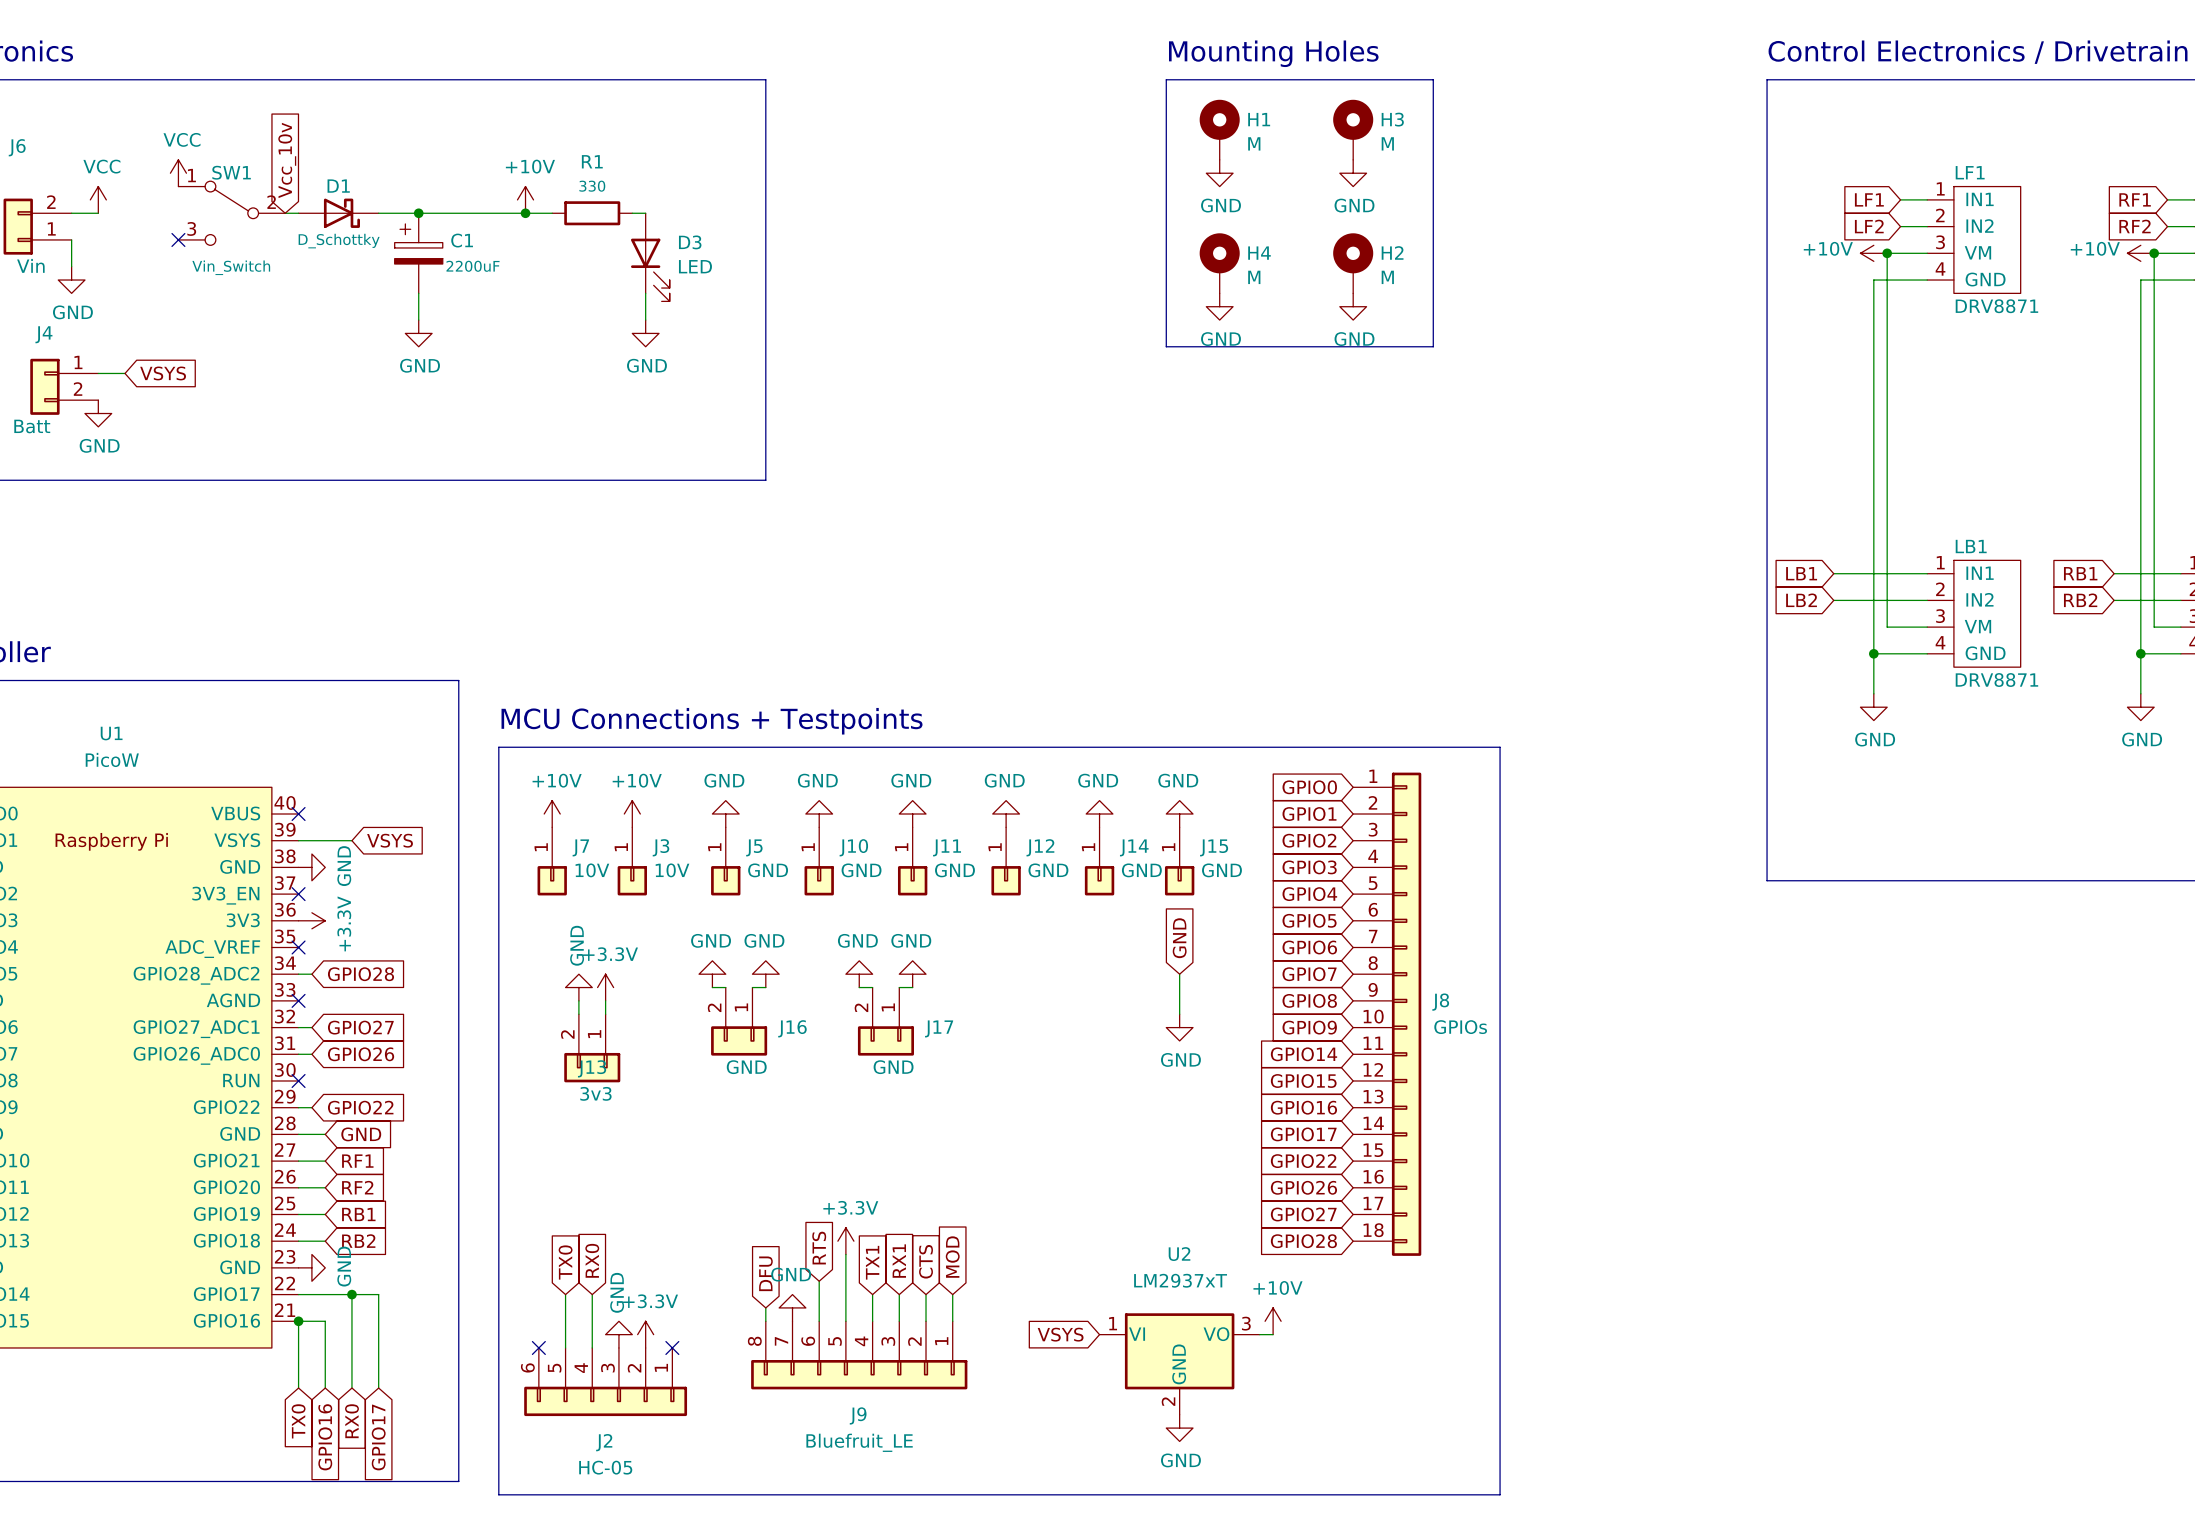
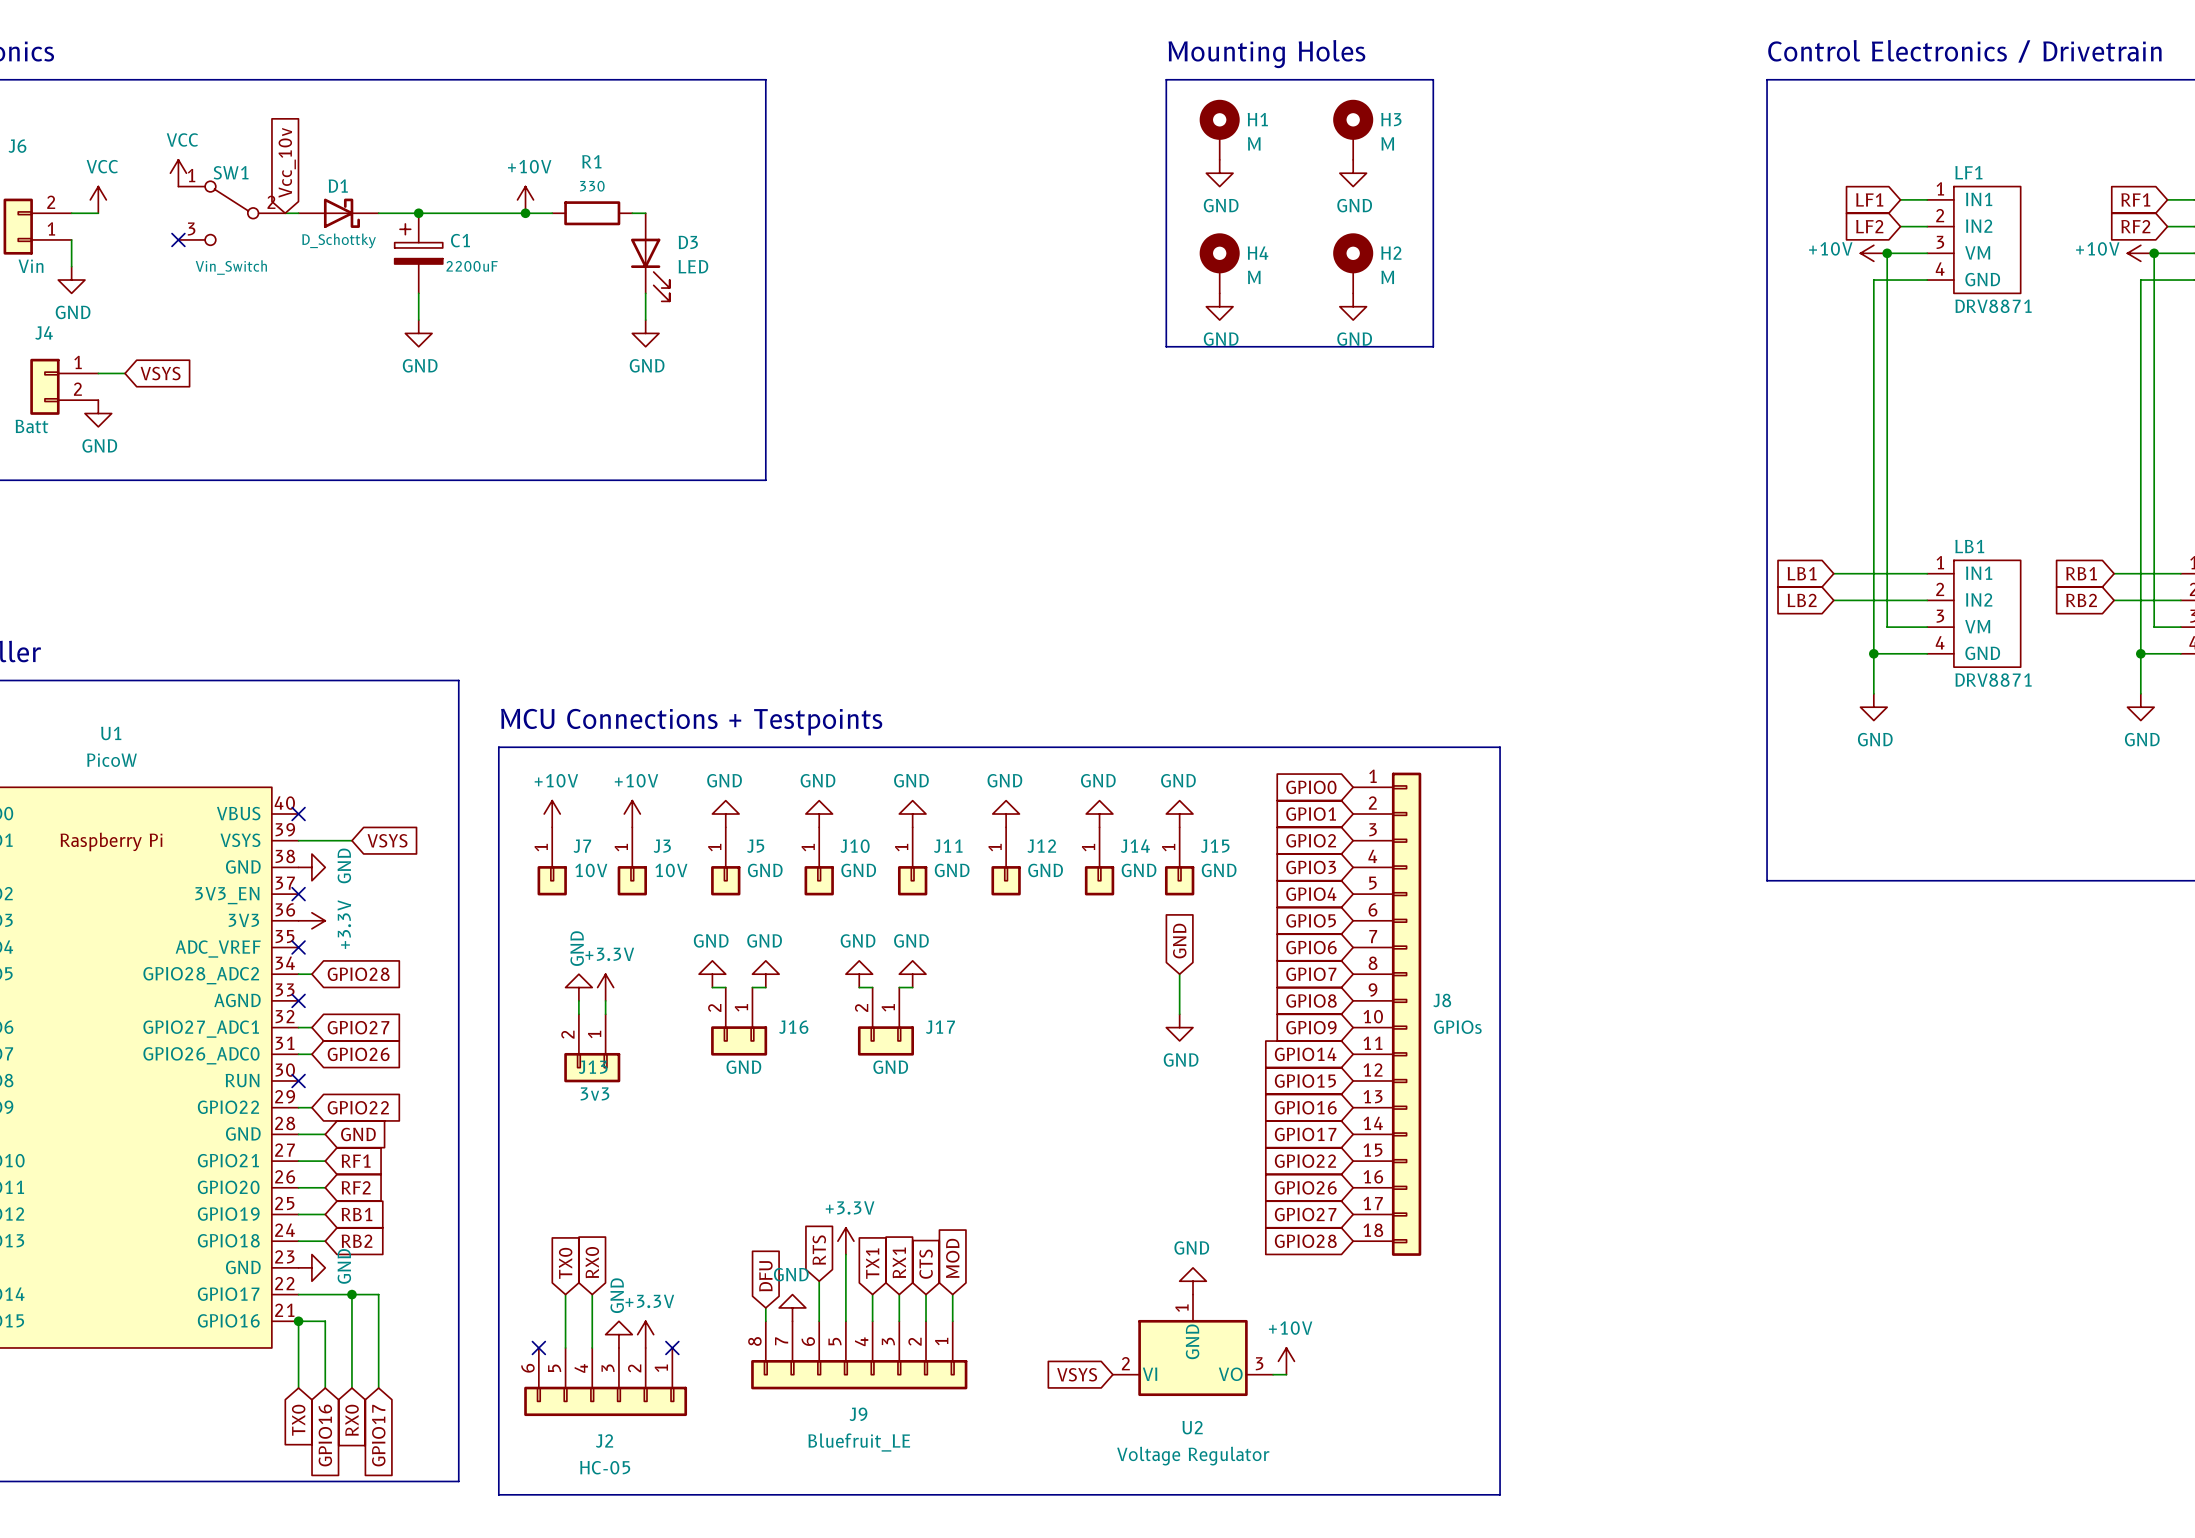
U2 name position: U2 (1179, 1254) -> U2 (1192, 1427)
U2 value: LM2937xT (1180, 1280) -> Voltage Regulator (1193, 1456)
U2 symbol: [1099, 1313, 1260, 1415] -> [1112, 1294, 1274, 1397]
power symbol position: +10V (1273, 1321) -> +10V (1286, 1361)
global label position: VSYS (1060, 1334) -> VSYS (1077, 1374)
wire: (1259, 1334) (1273, 1334) -> (1273, 1374) (1286, 1374)
power symbol rotation: 0° (1179, 1428) -> 180° (1192, 1281)
power symbol position: GND (1179, 1428) -> GND (1192, 1281)

